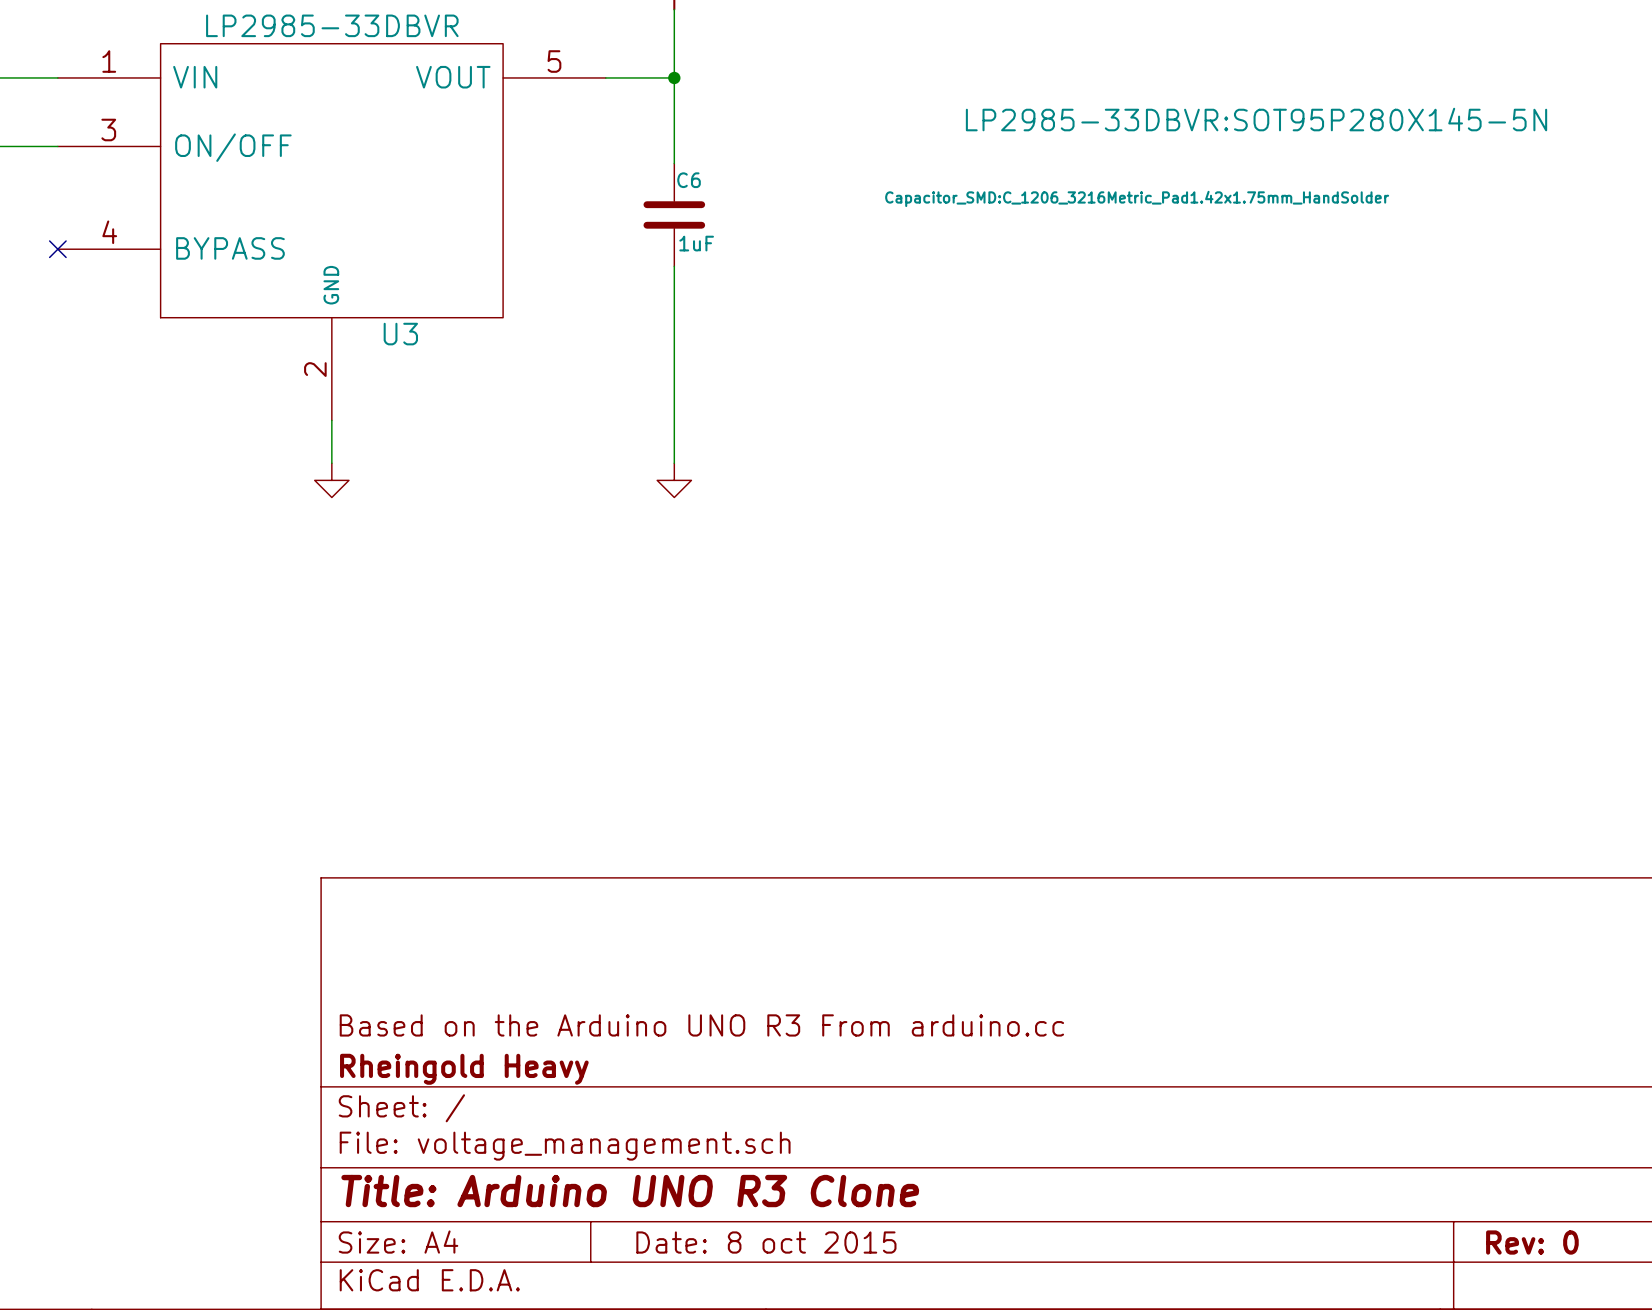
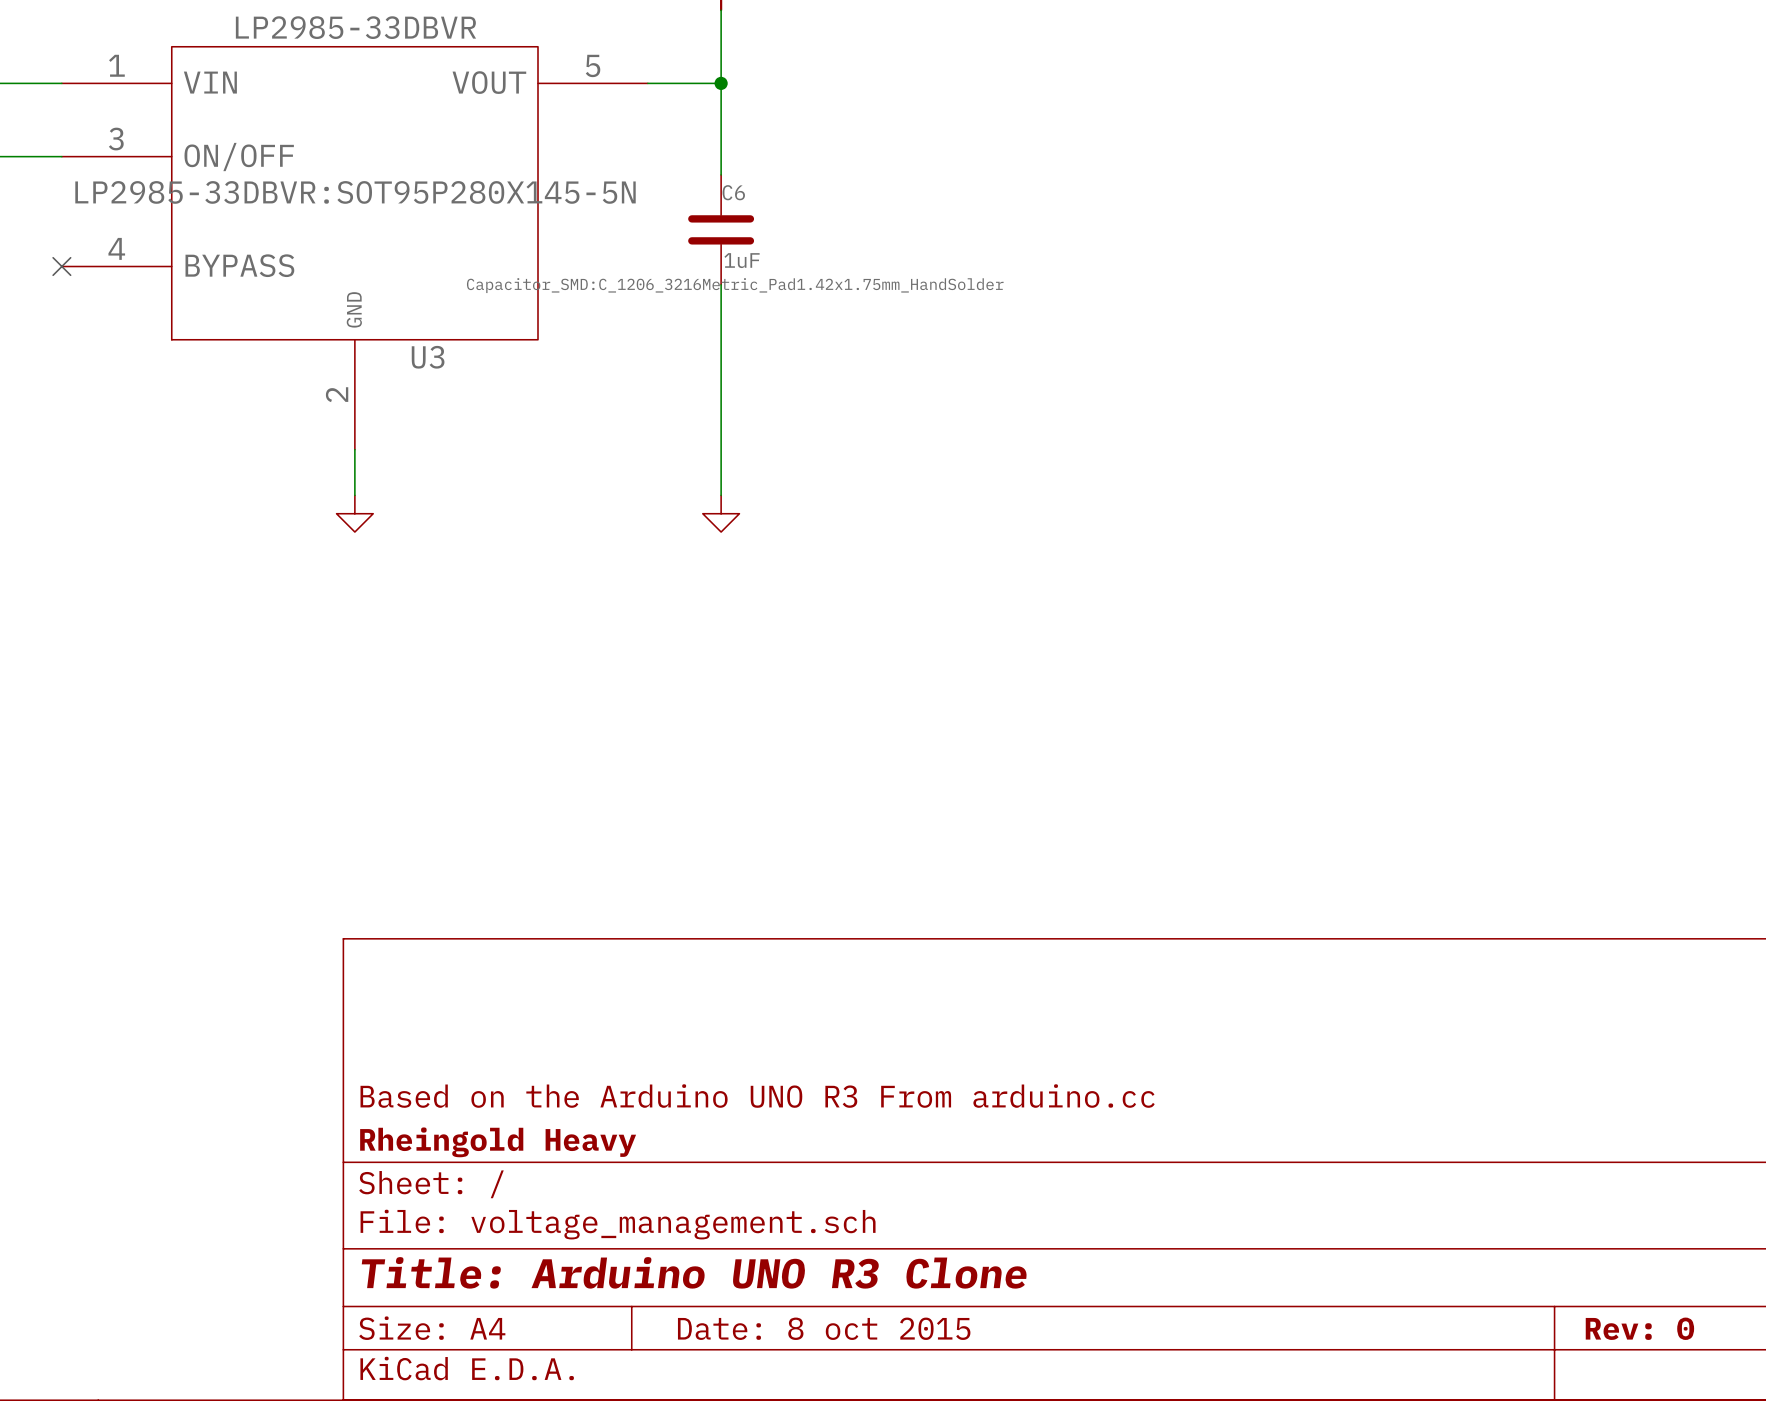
U3 text position: LP2985-33DBVR:SOT95P280X145-5N (1256, 119) -> LP2985-33DBVR:SOT95P280X145-5N (355, 192)
C6 text position: Capacitor_SMD:C_1206_3216Metric_Pad1.42x1.75mm_HandSolder (1137, 198) -> Capacitor_SMD:C_1206_3216Metric_Pad1.42x1.75mm_HandSolder (735, 285)

